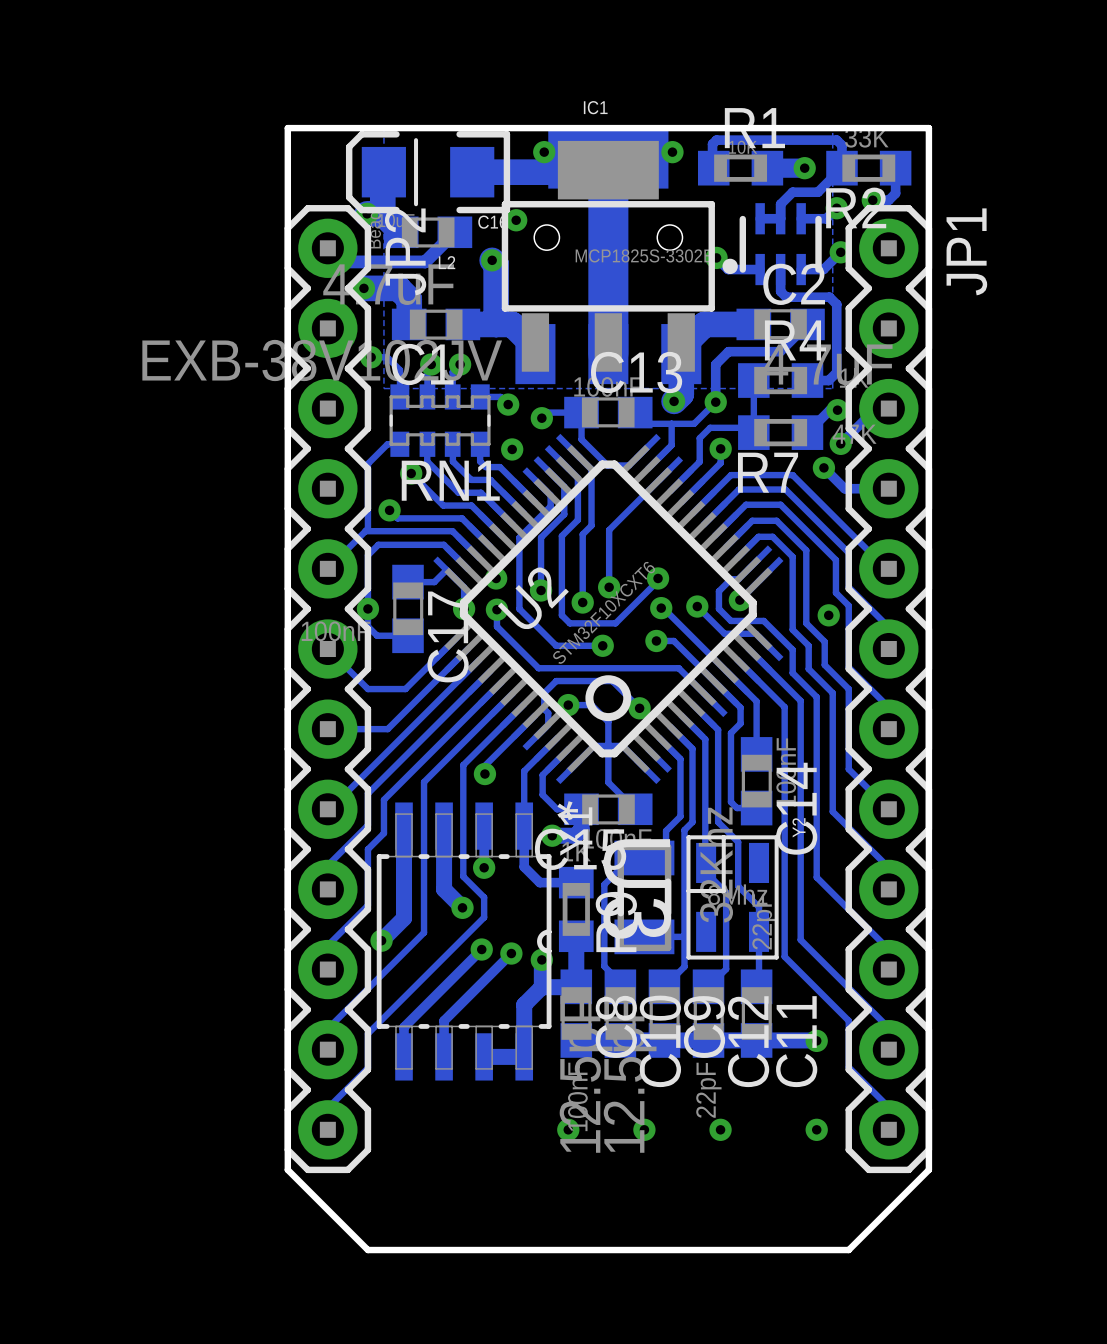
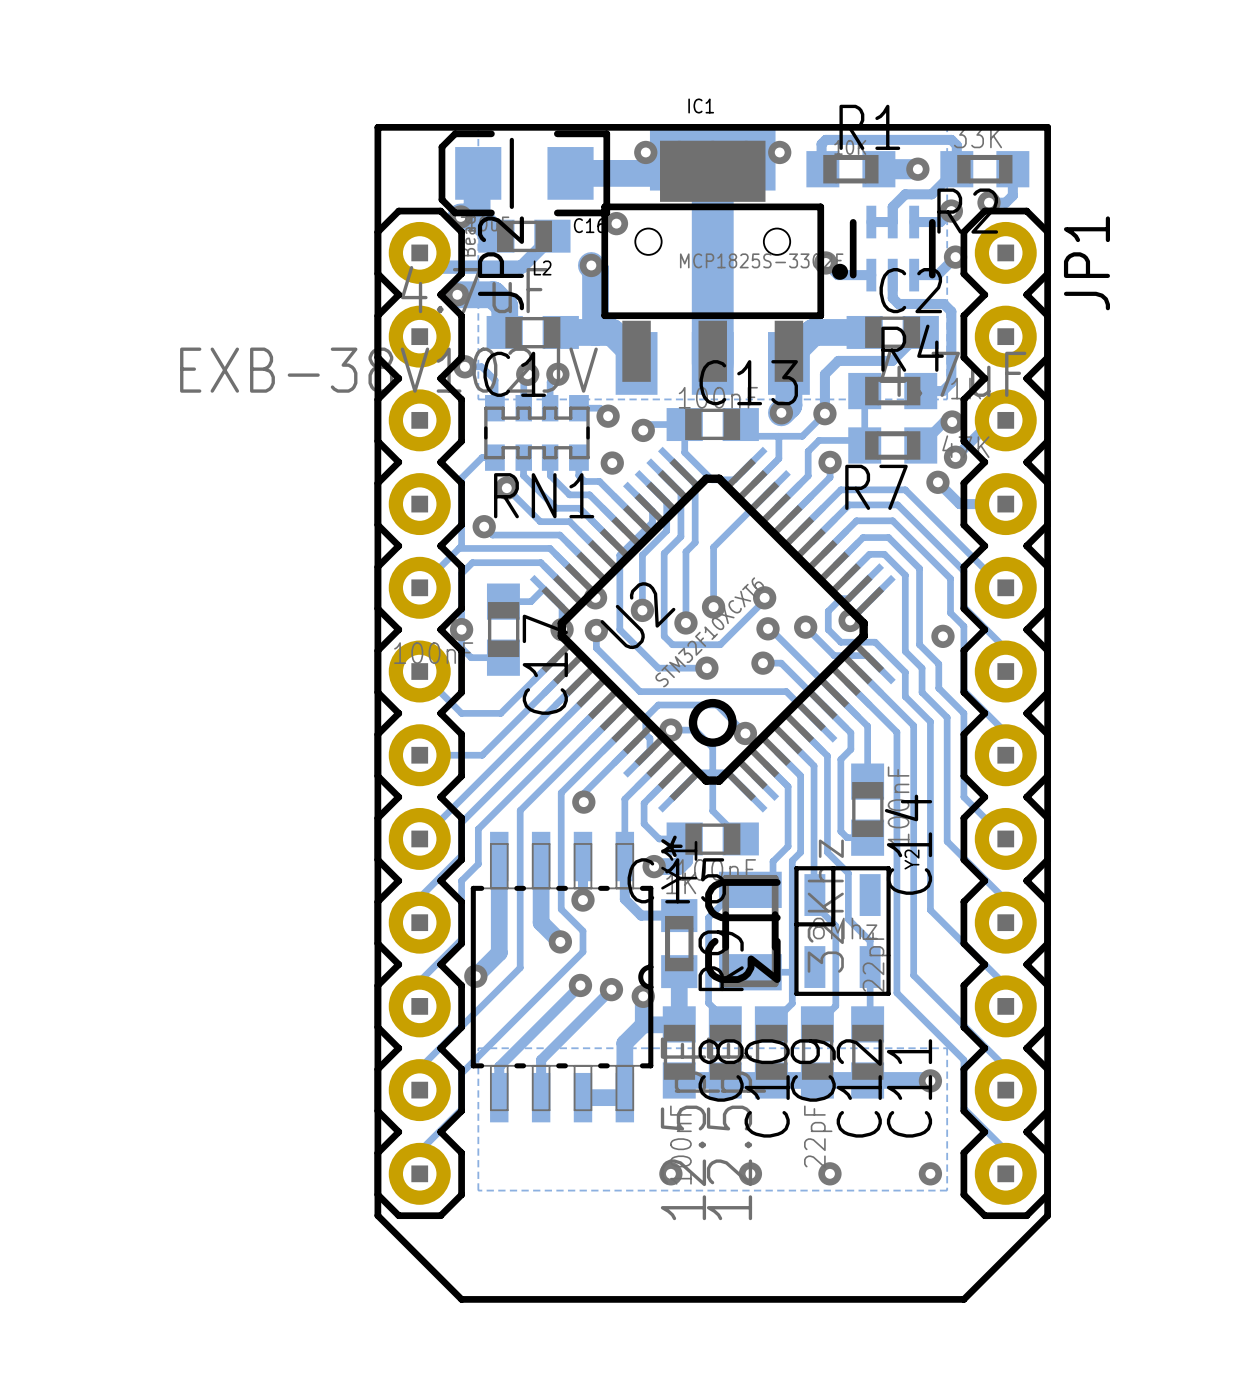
zone outline: none -> (947, 1048) (478, 1048) (478, 1190) (947, 1190) (947, 1048)

